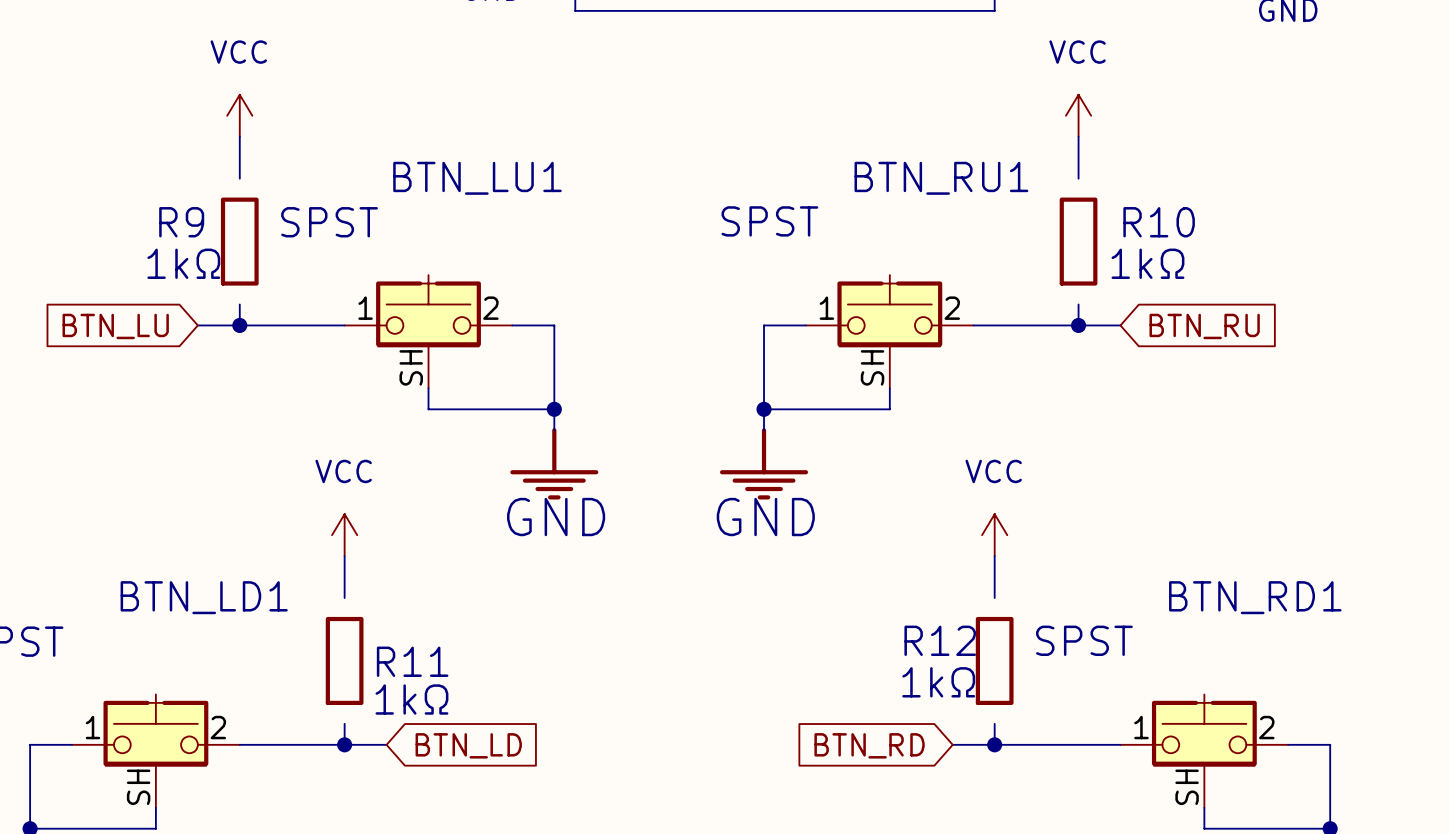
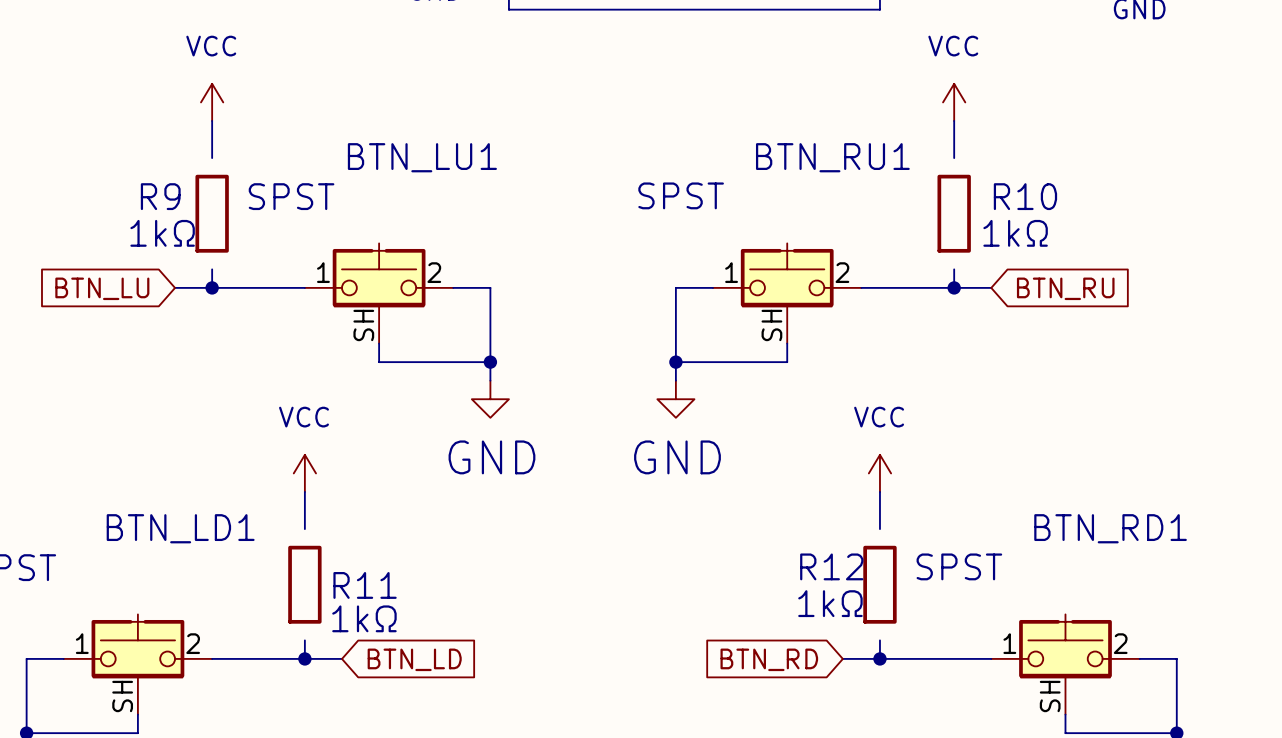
power symbol shape: [510, 428, 599, 500] -> [471, 380, 509, 418]
power symbol shape: [719, 428, 809, 500] -> [657, 380, 695, 418]

